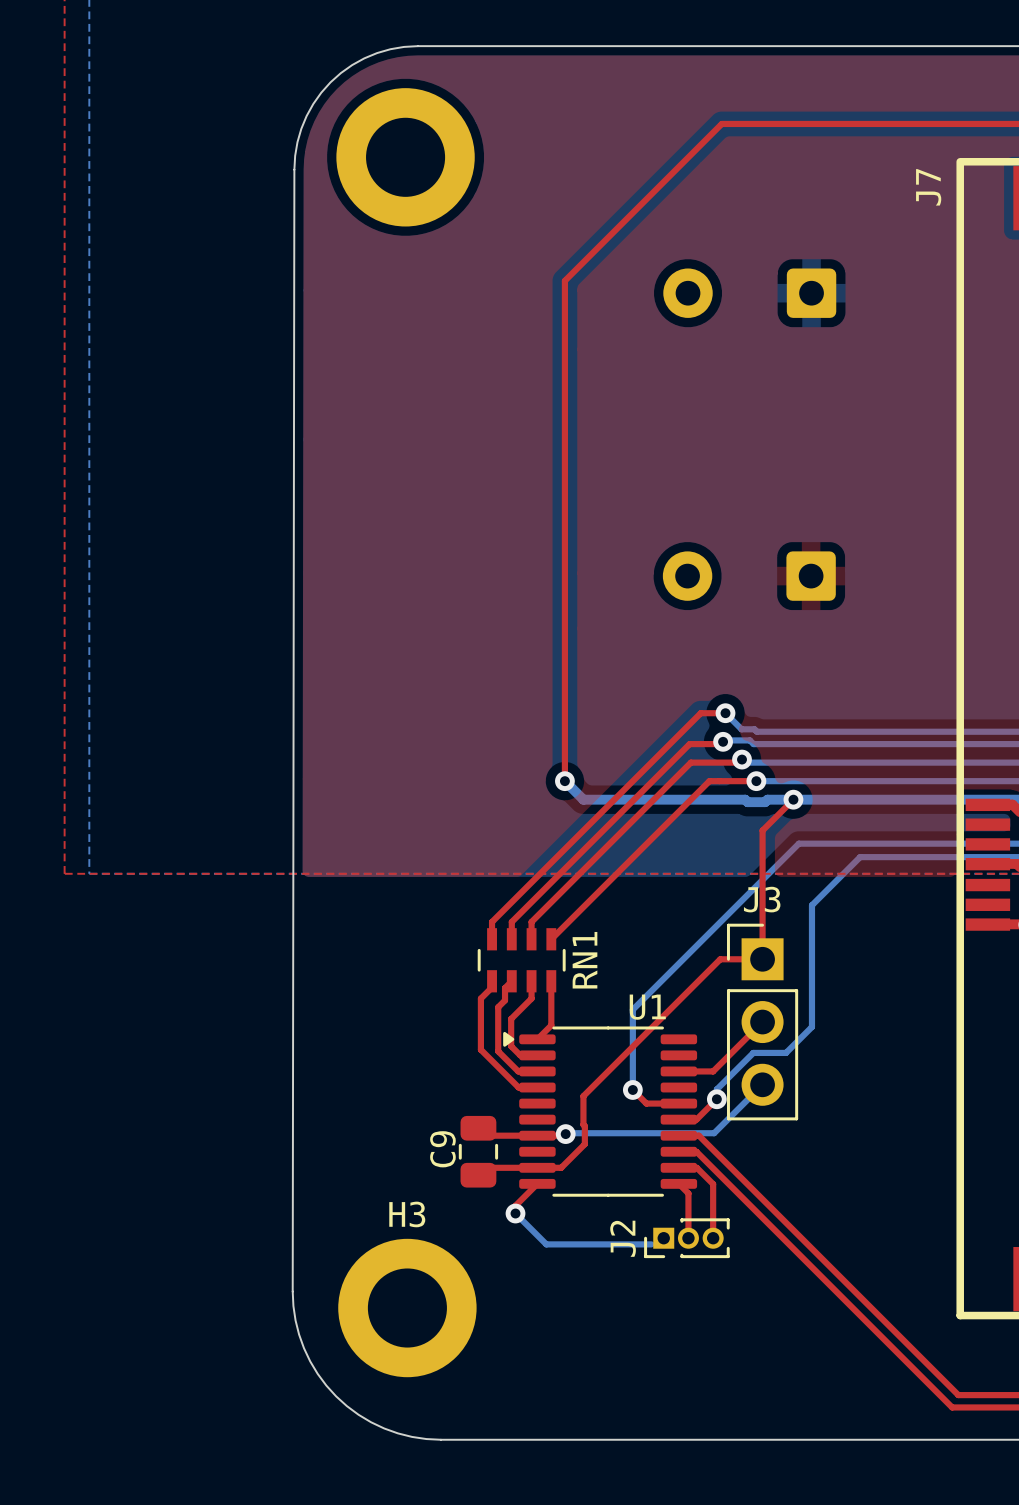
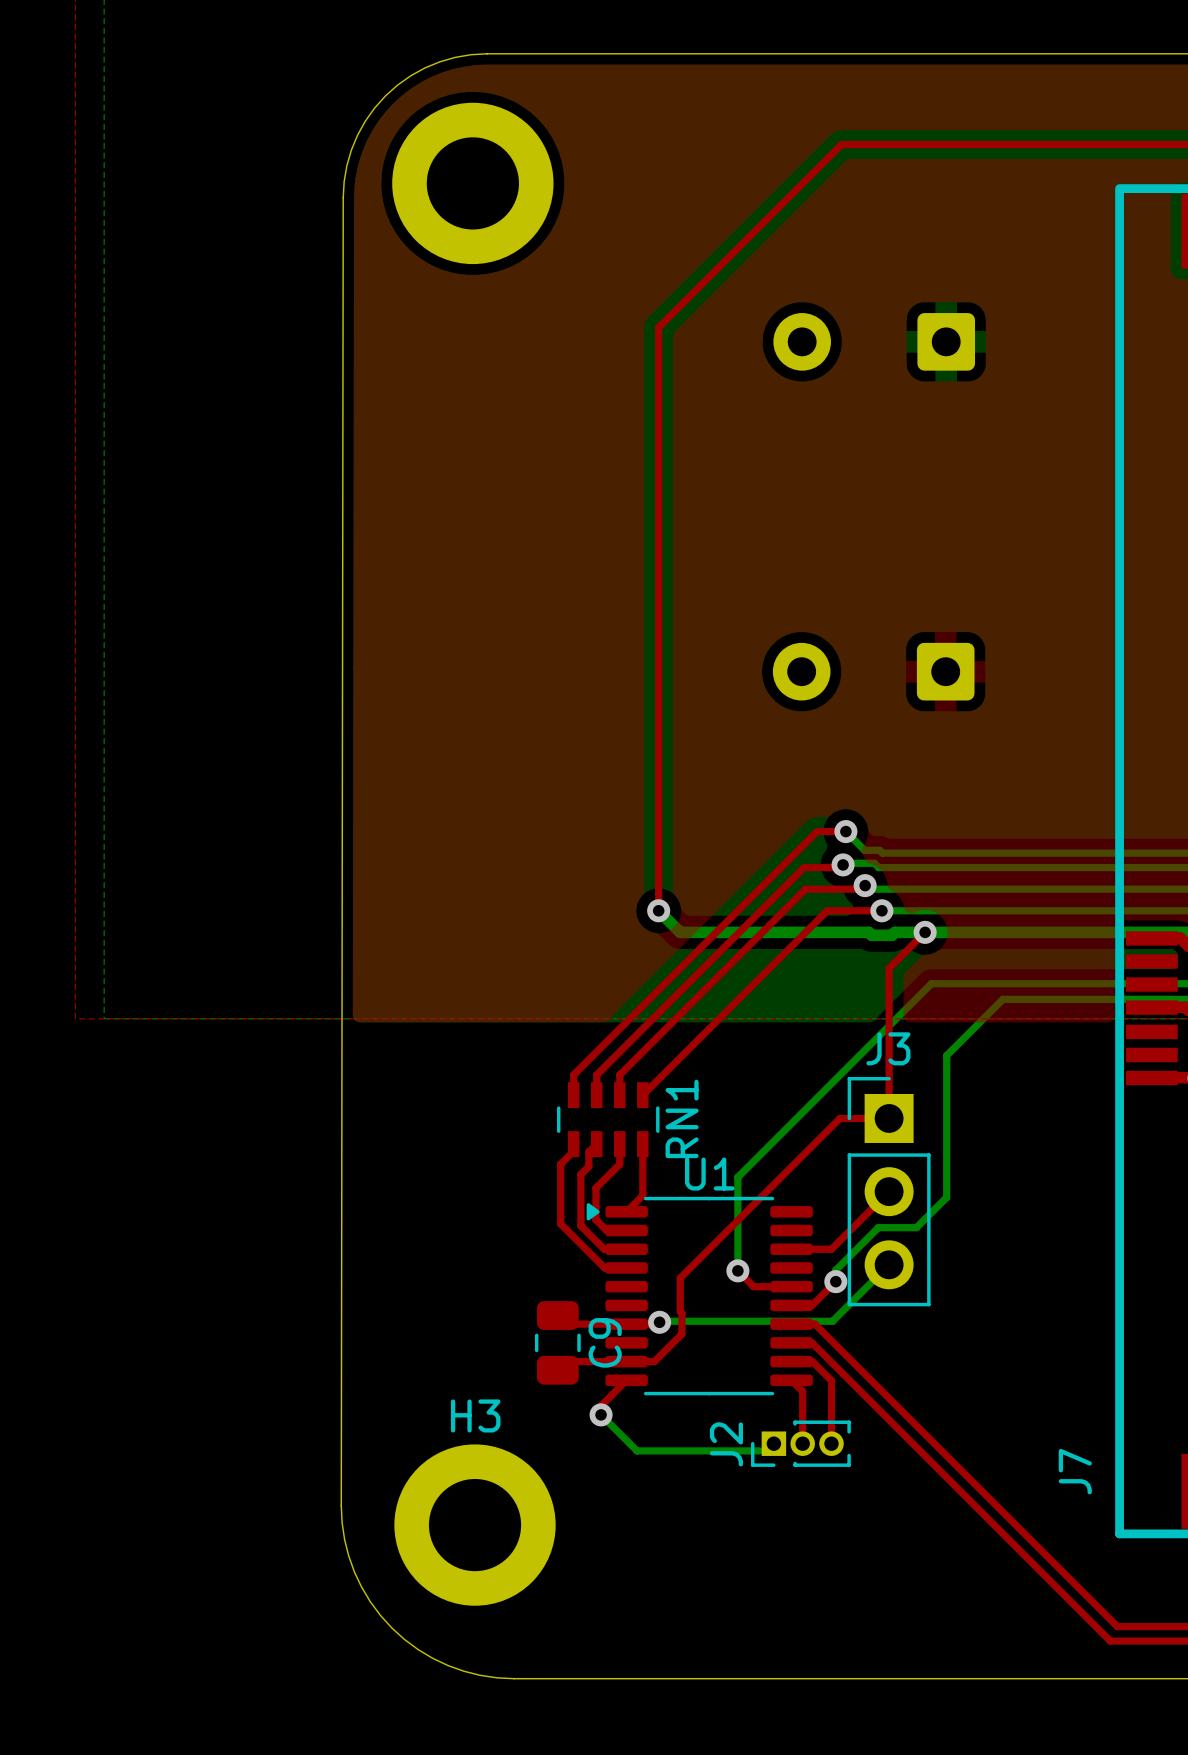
J7 name position: J7 (928, 187) -> J7 (1075, 1471)
U1 name position: U1 (647, 1007) -> U1 (709, 1174)
C9 name position: C9 (442, 1149) -> C9 (605, 1342)

